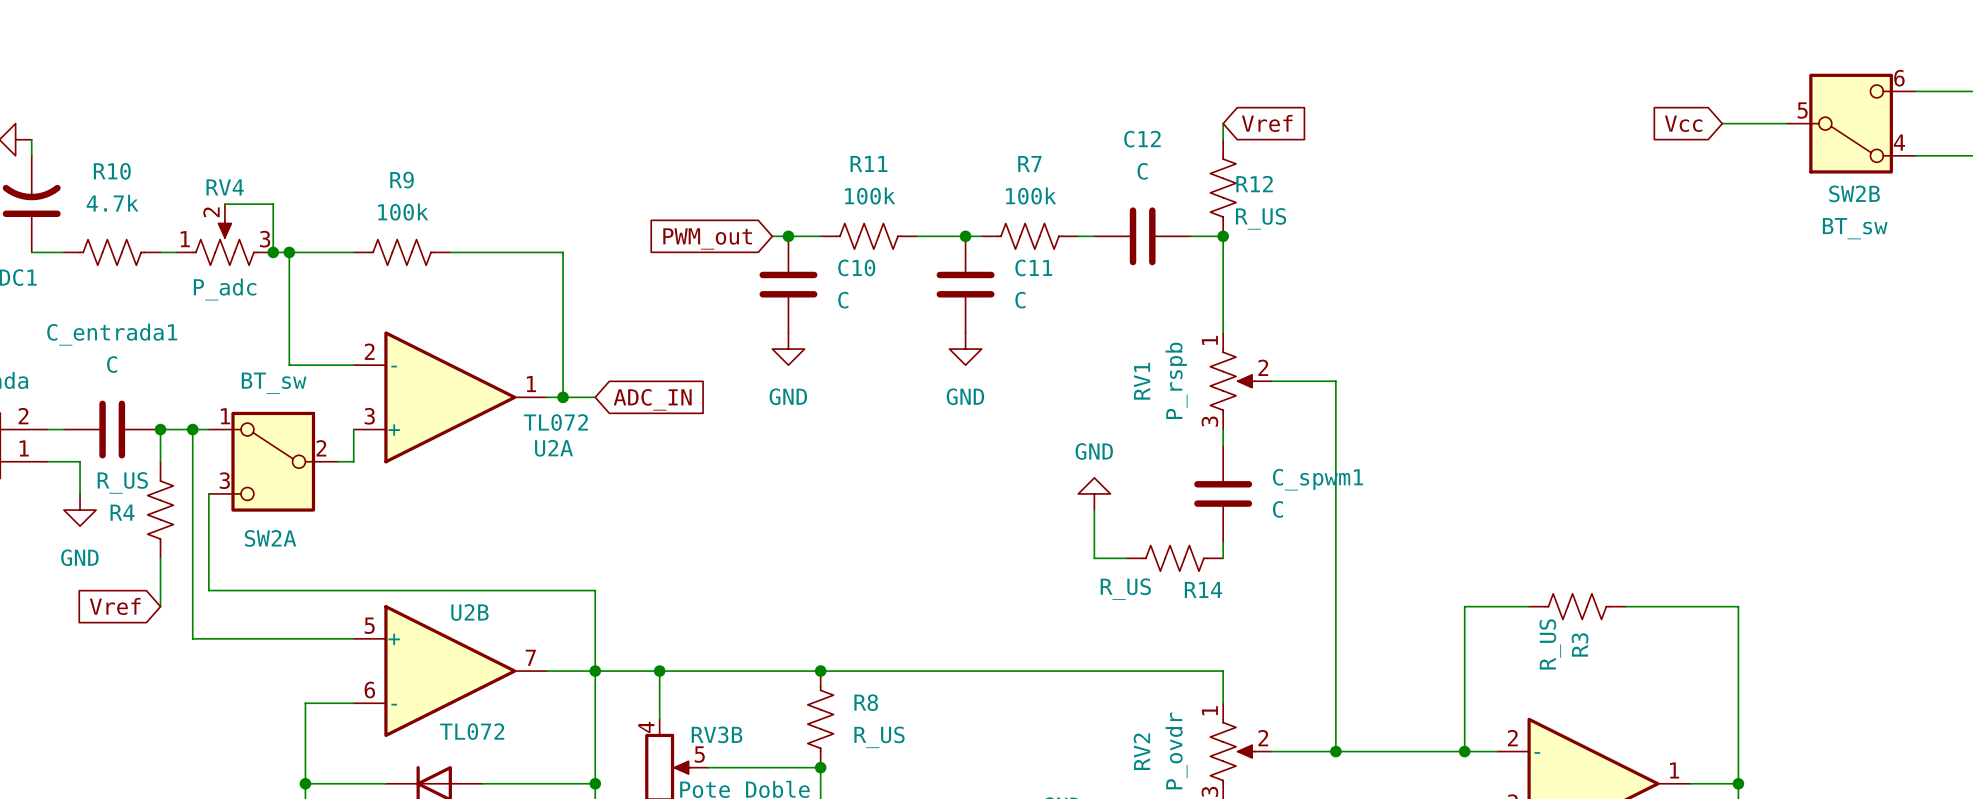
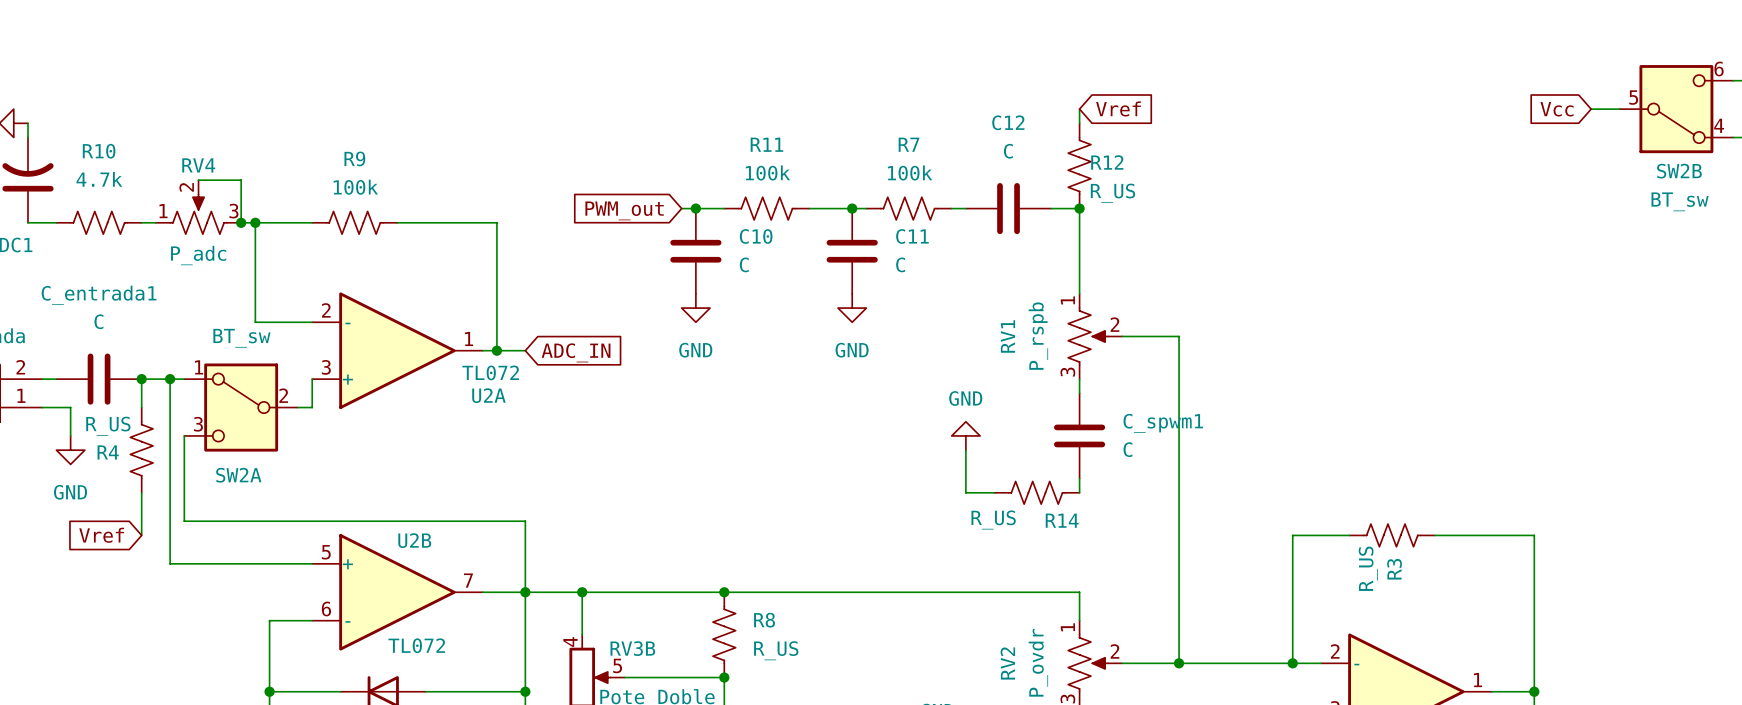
global label position: Vcc (1683, 123) -> Vcc (1557, 109)
wire: (1722, 123) (1786, 123) -> none
SW2B position: (1851, 123) -> (1676, 109)

